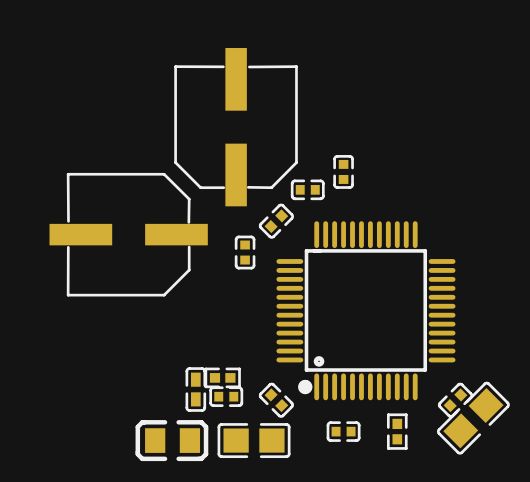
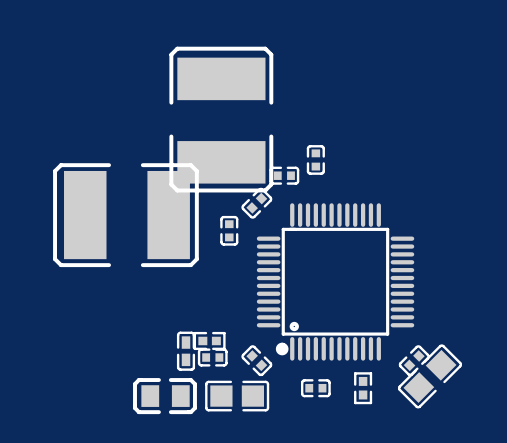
part footprint: [174, 48, 298, 207] -> [169, 46, 274, 193]
part footprint: [49, 172, 208, 297] -> [53, 163, 199, 268]

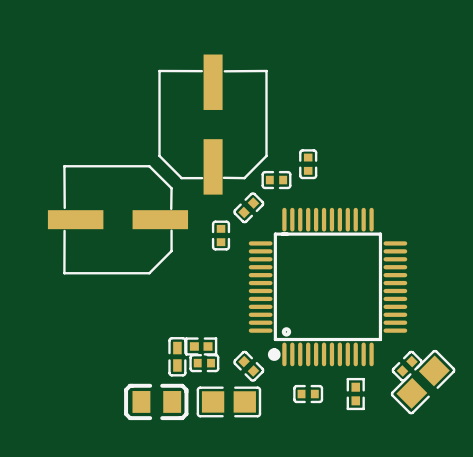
part footprint: [169, 46, 274, 193] -> [158, 54, 268, 195]
part footprint: [53, 163, 199, 268] -> [47, 165, 189, 275]

